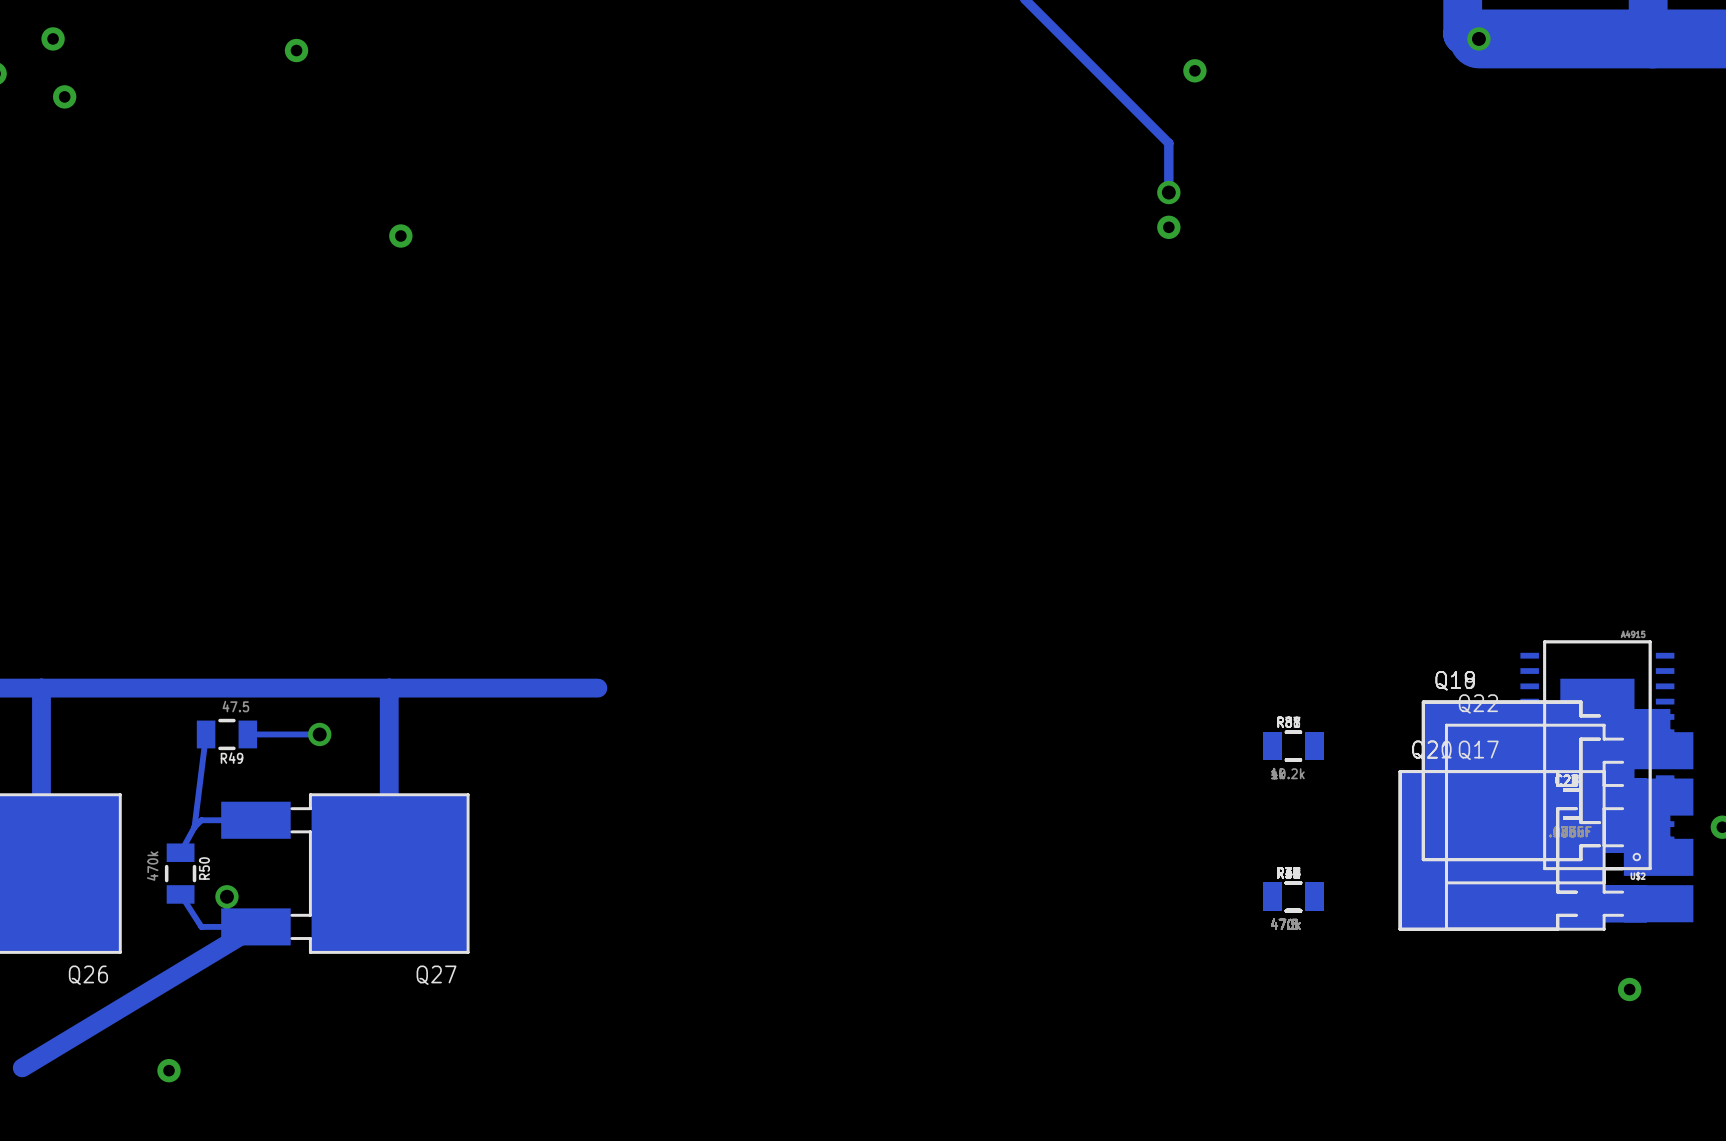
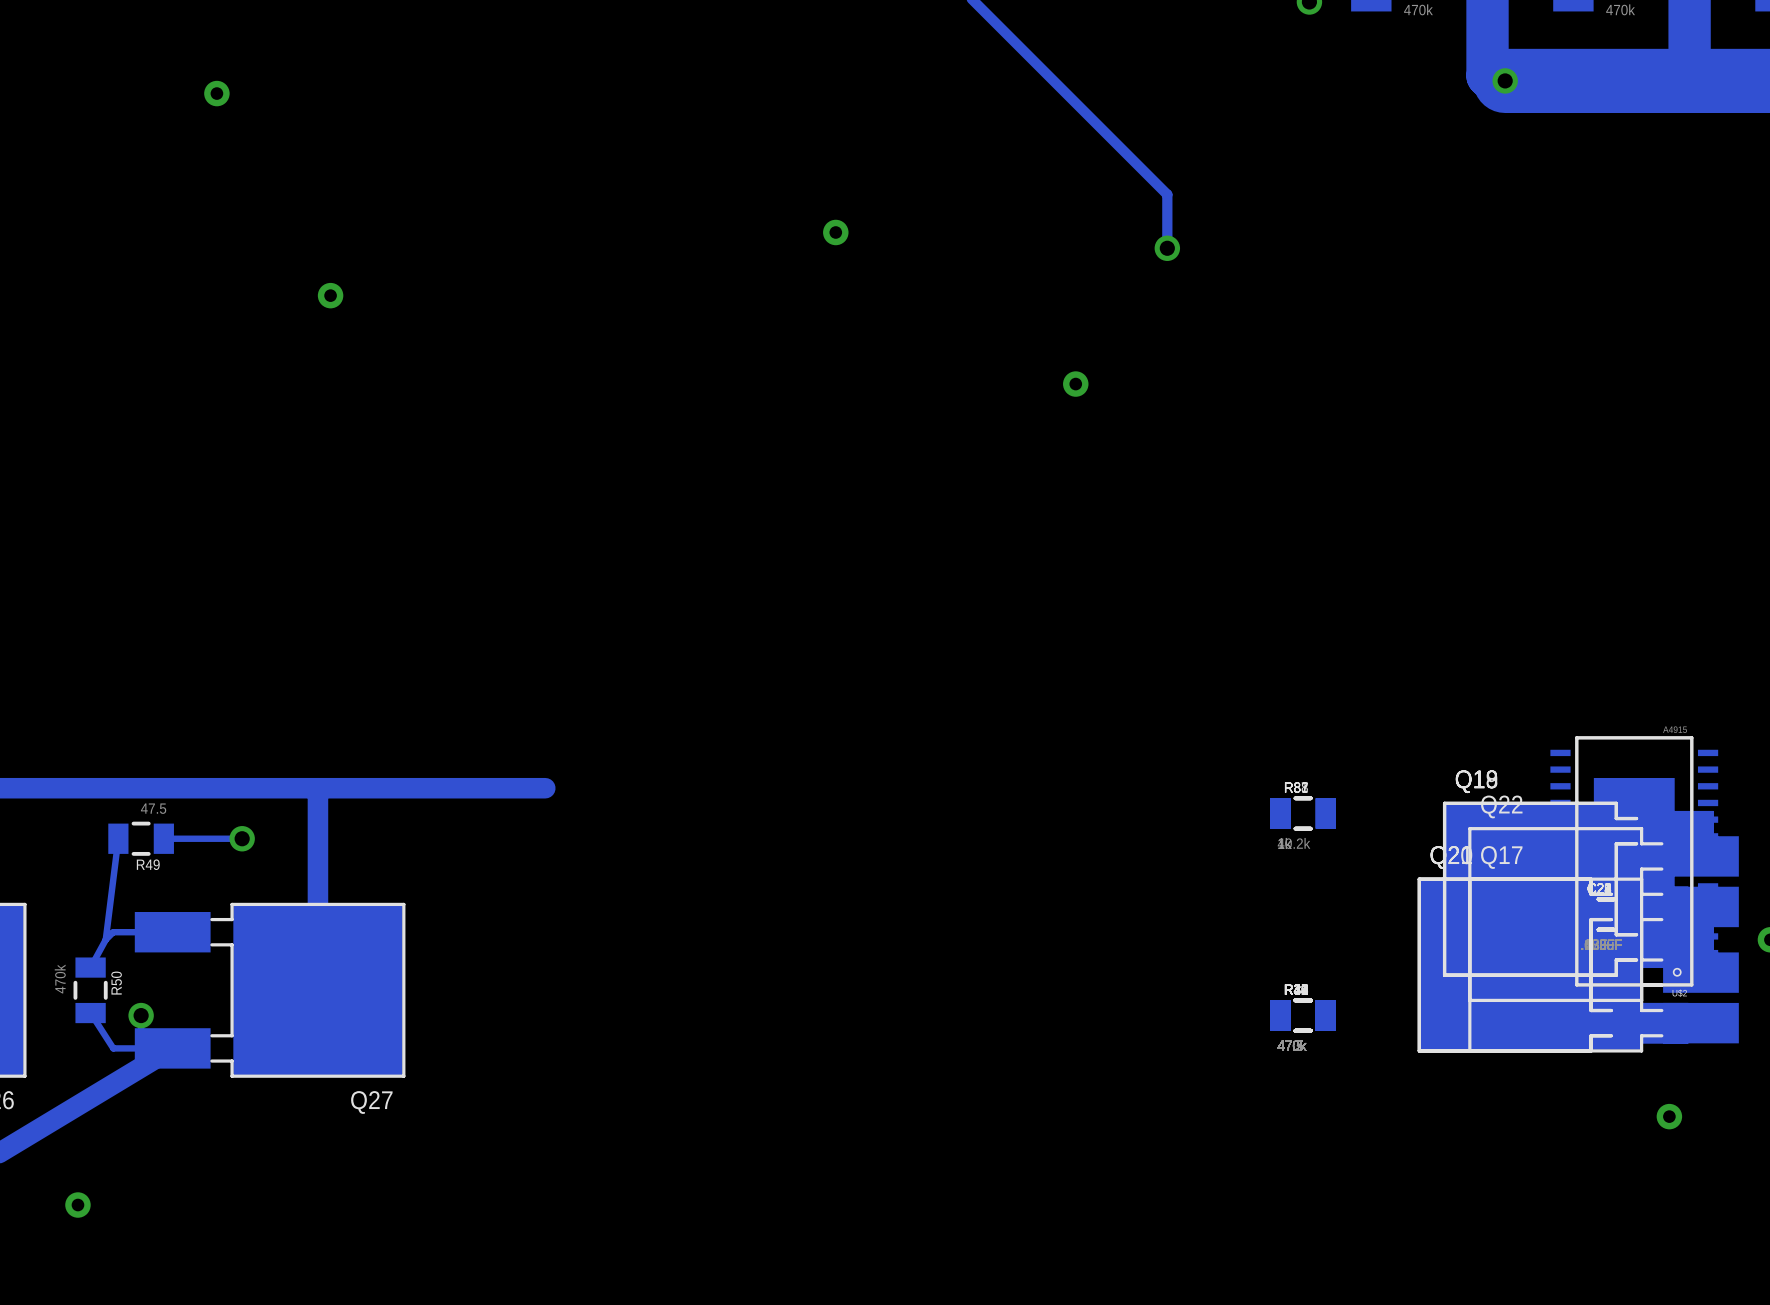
part: (1194, 70) -> none
part: none -> (835, 232)
part position: (1168, 227) -> (1075, 384)
part position: (1293, 746) -> (1303, 813)
part position: (1293, 746) -> (1303, 813)
part position: (1293, 746) -> (1303, 813)

